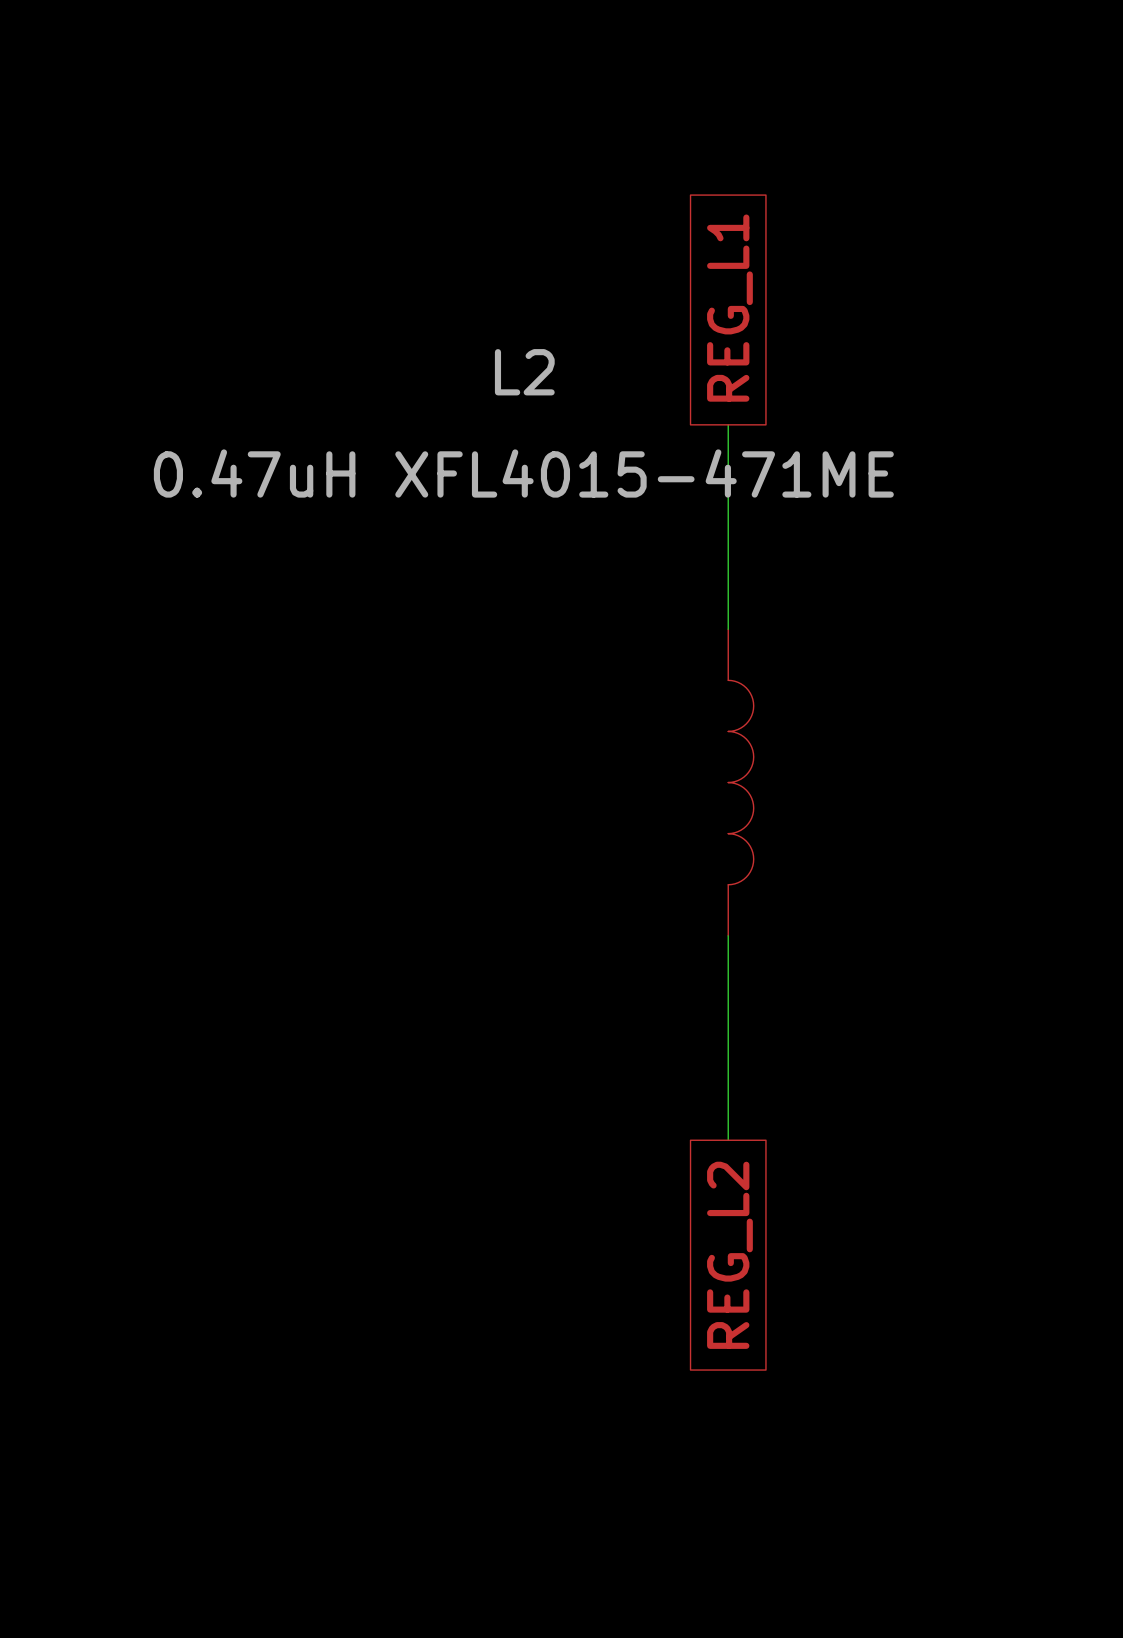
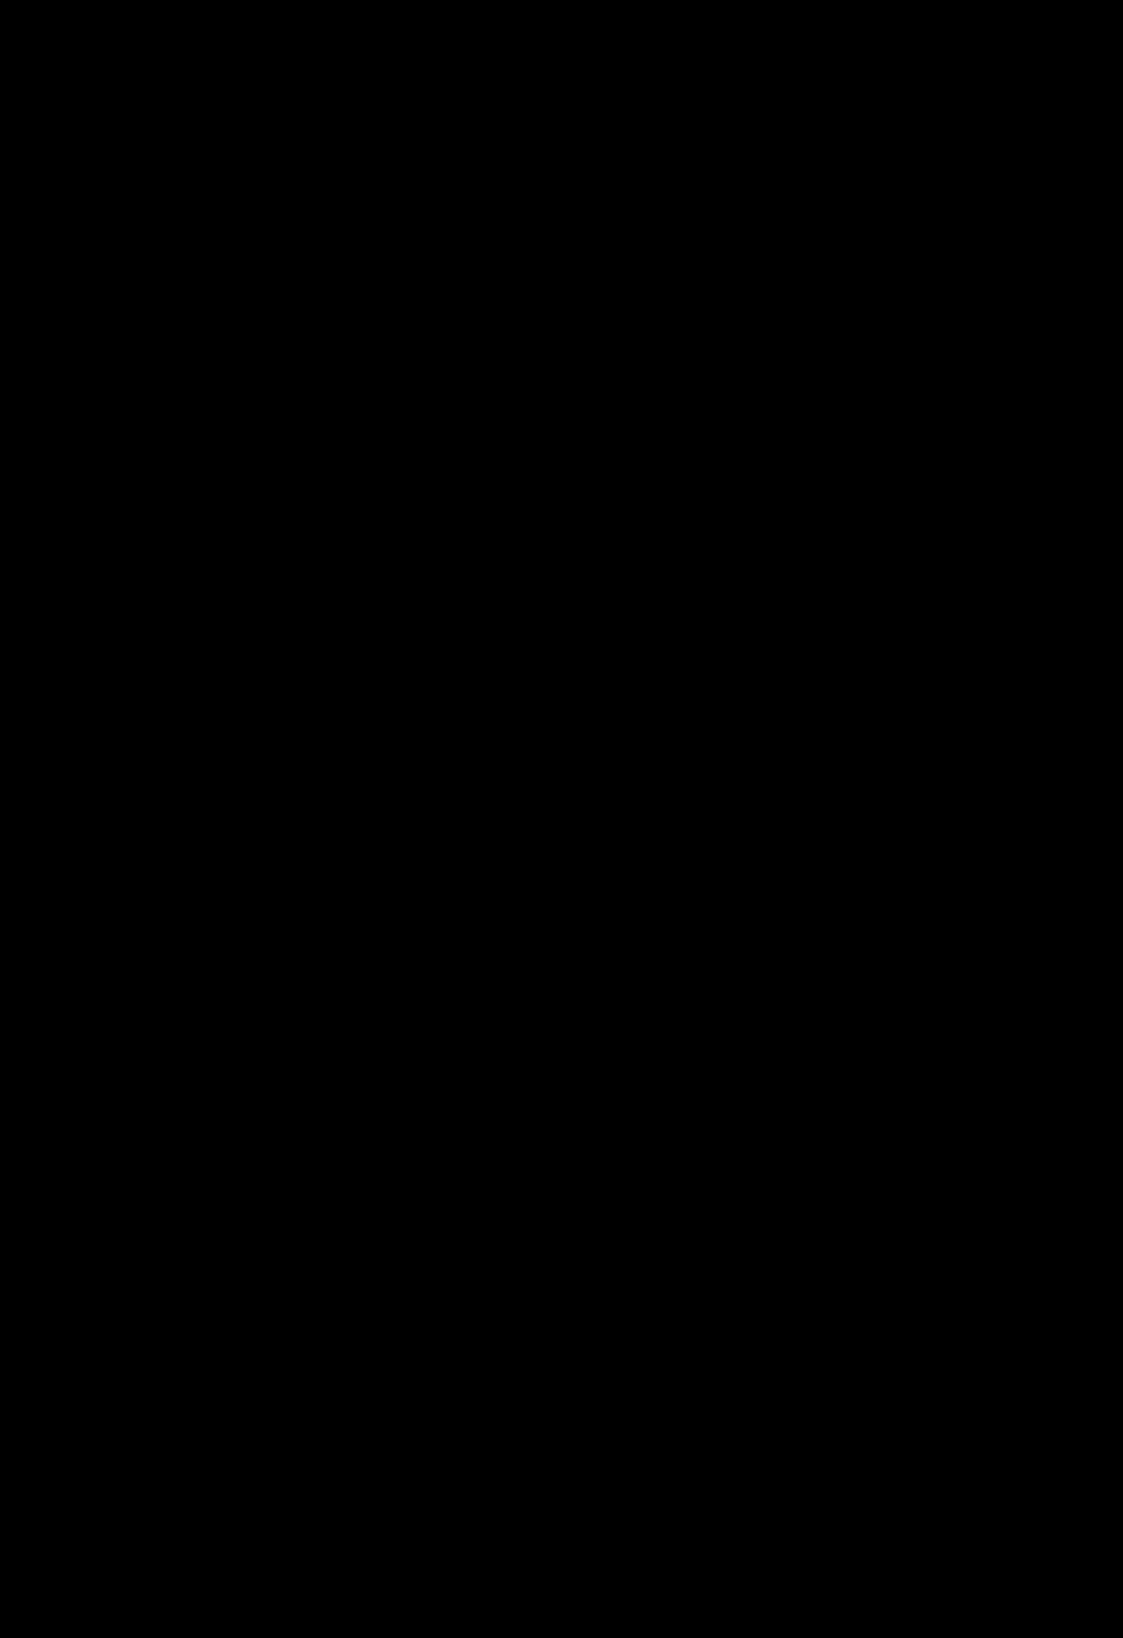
global label: REG_L1 (729, 308) -> none
wire: (728, 424) (728, 629) -> none
L2: 0.47uH XFL4015-471ME (740, 782) -> none
wire: (728, 935) (728, 1140) -> none
global label: REG_L2 (729, 1255) -> none

